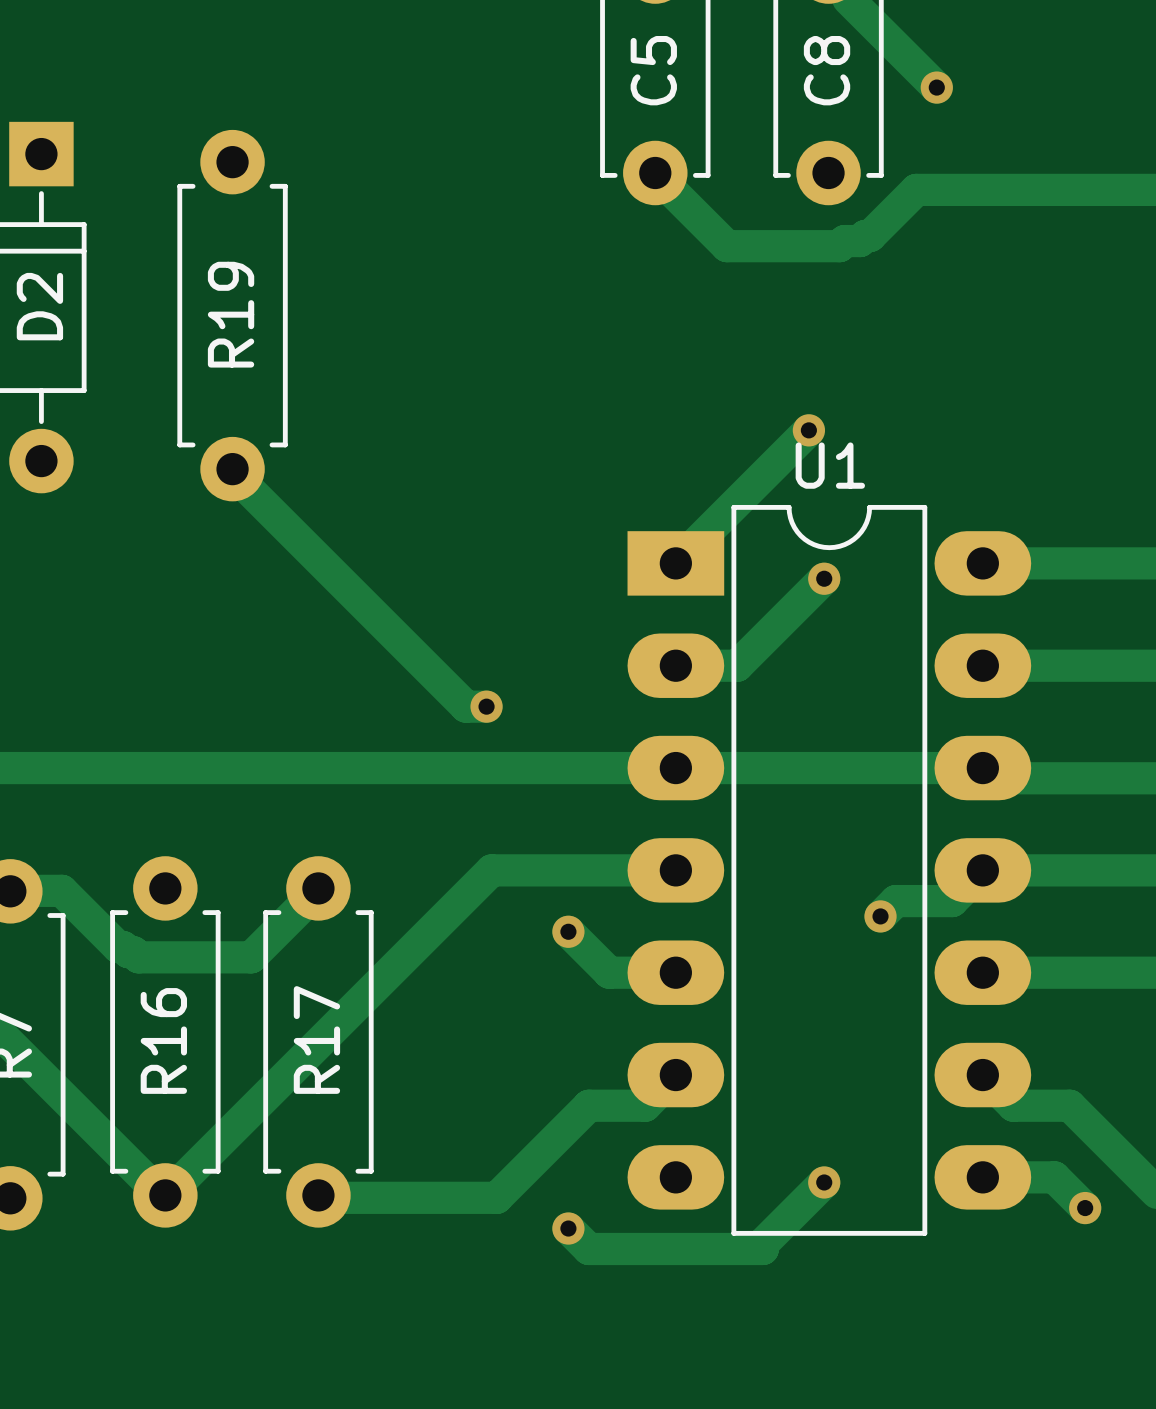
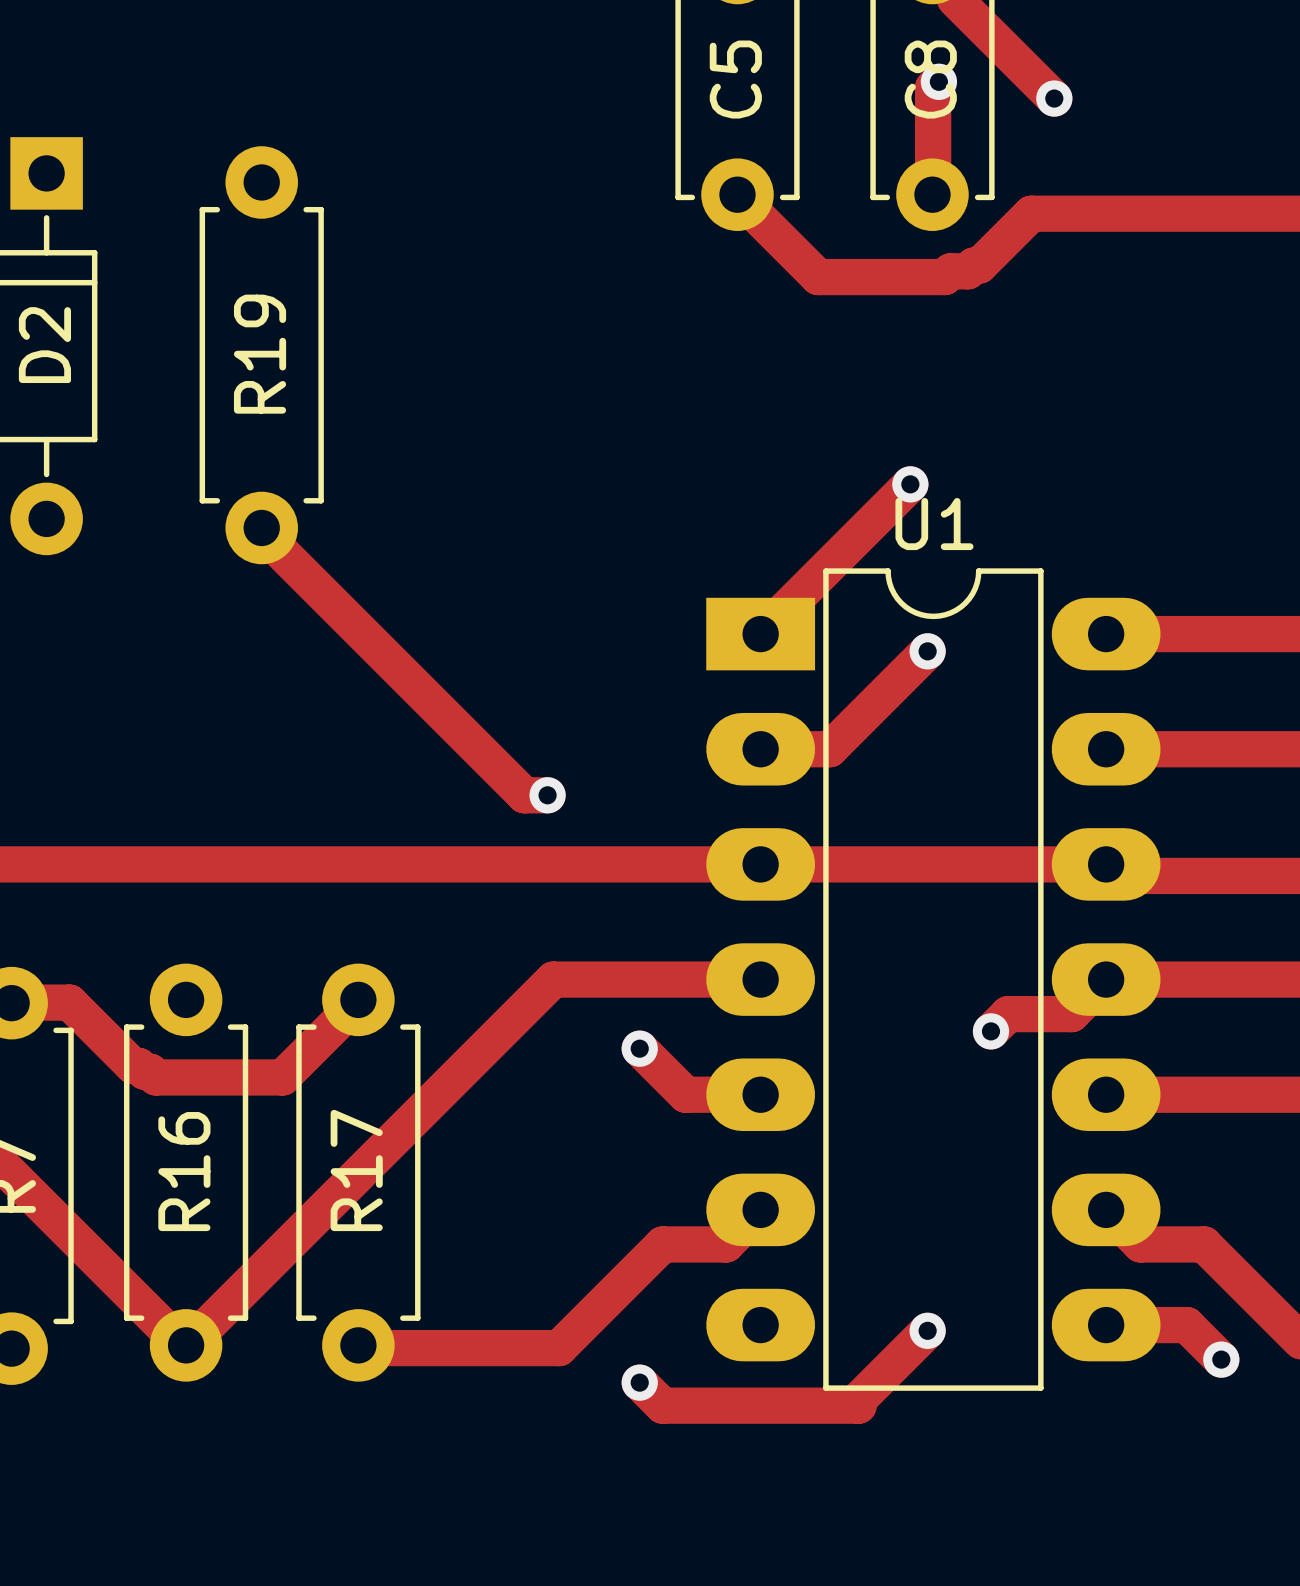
track: none -> (938, 81) (933, 87) (933, 196) (932, 194)
via: none -> (938, 81)

